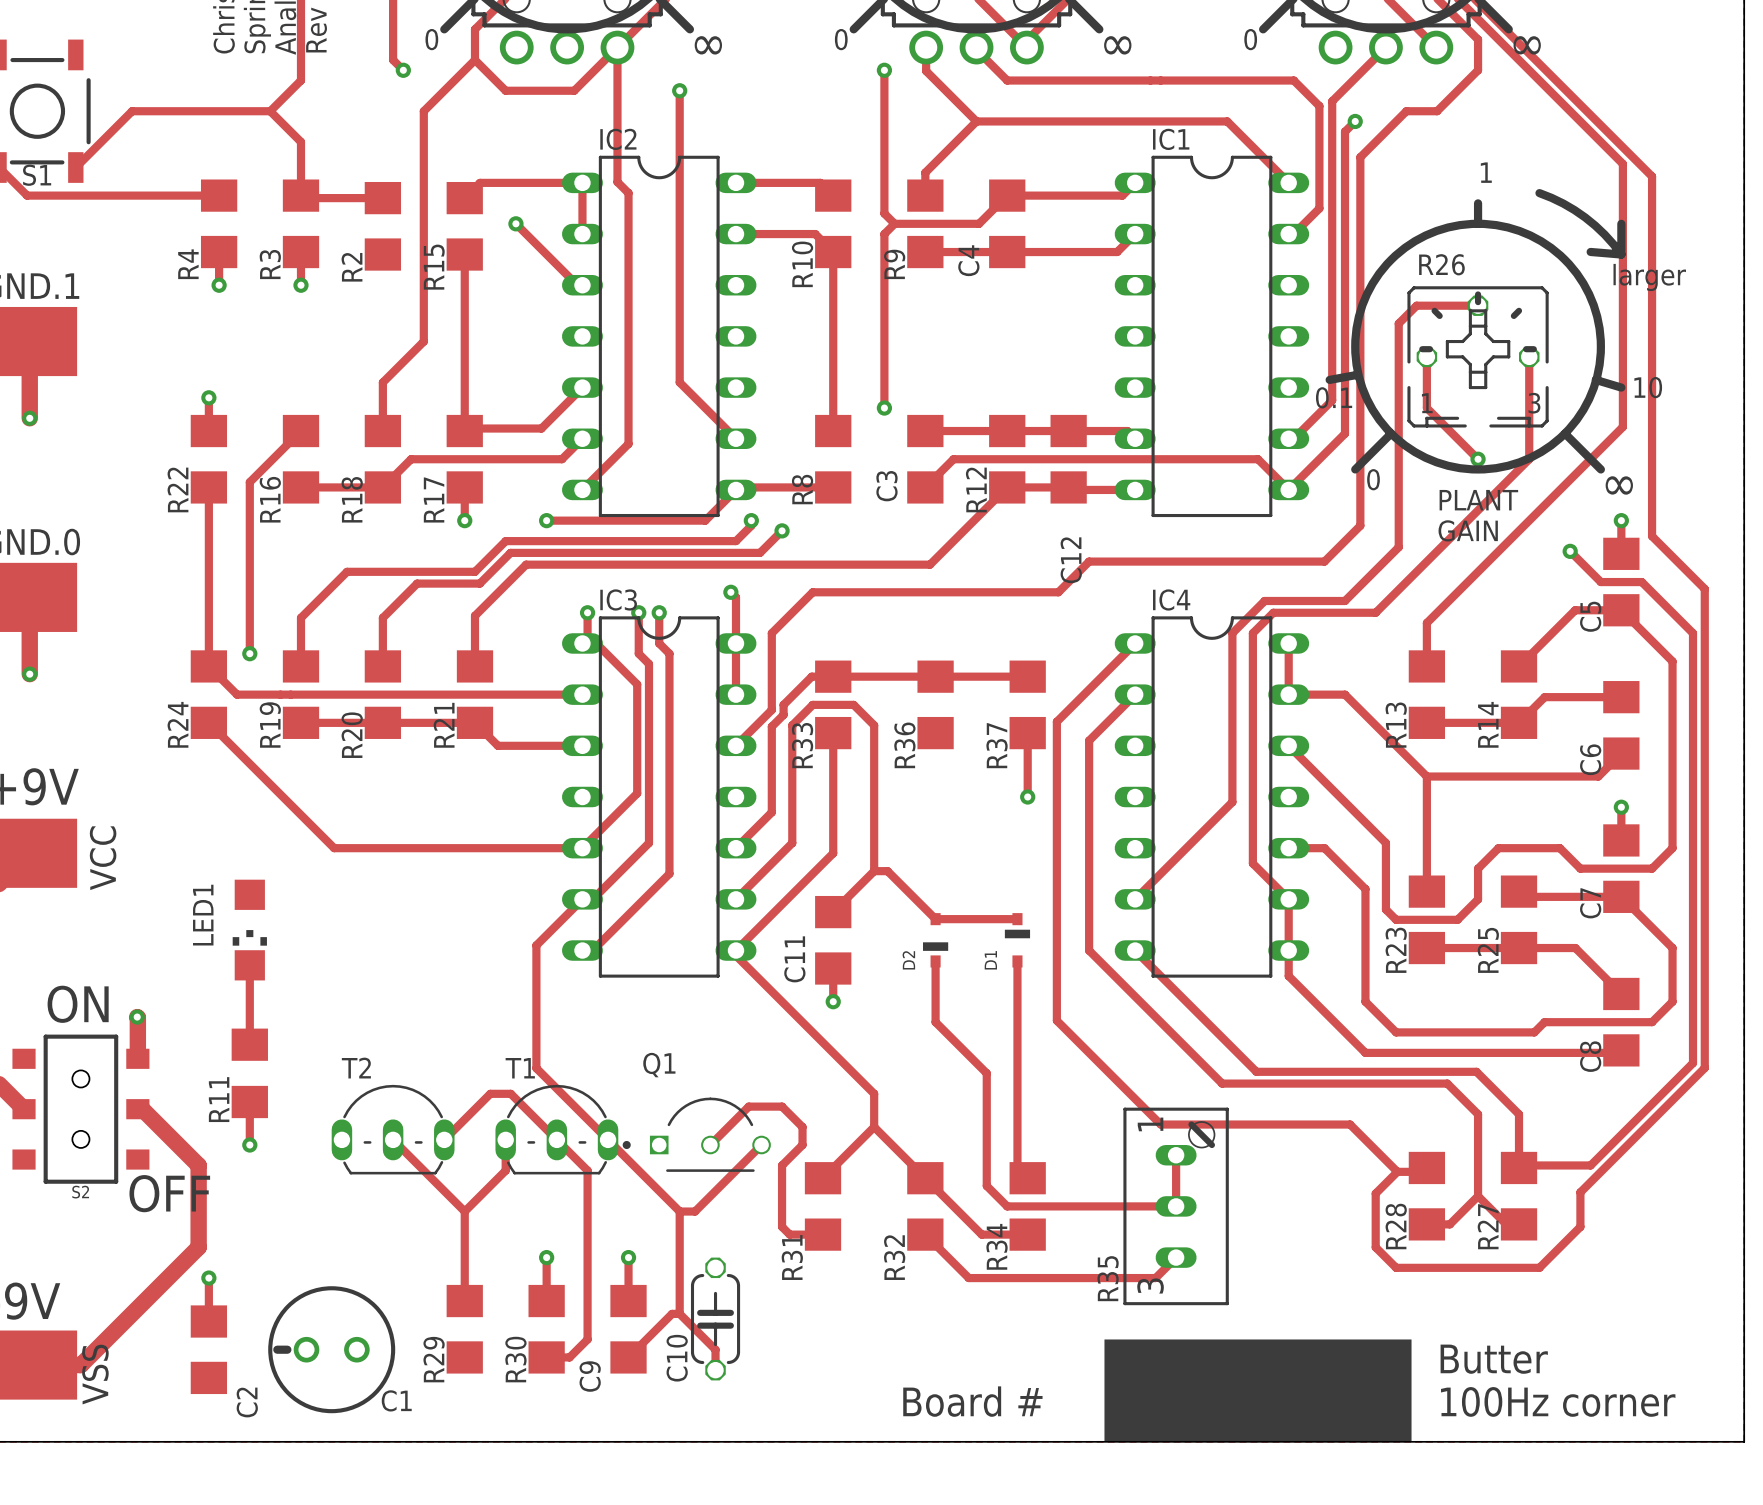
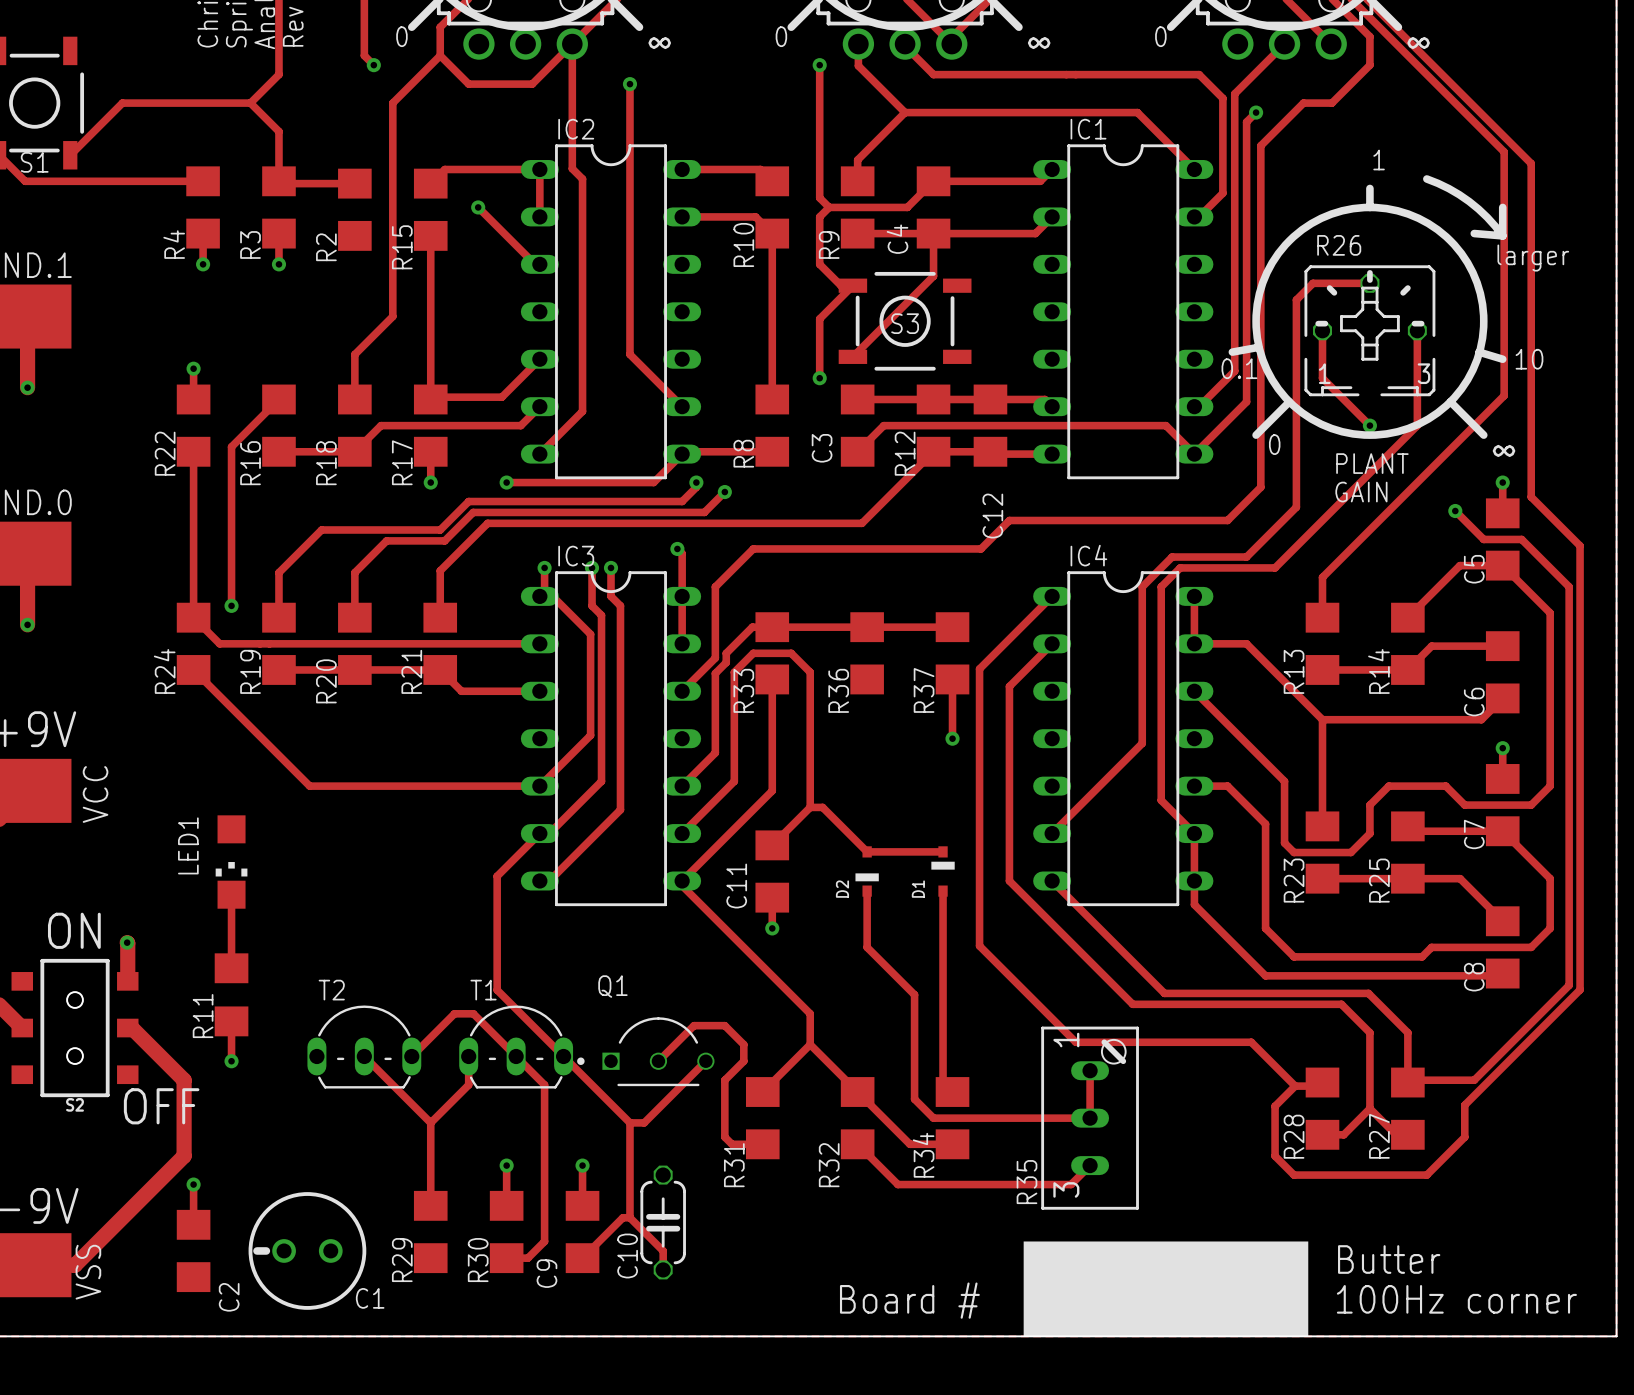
track: none -> (933, 233) (933, 276) (852, 356)
track: (884, 285) (884, 344) -> (819, 264) (841, 285) (852, 285) (819, 318)
S3: none -> (905, 321)

